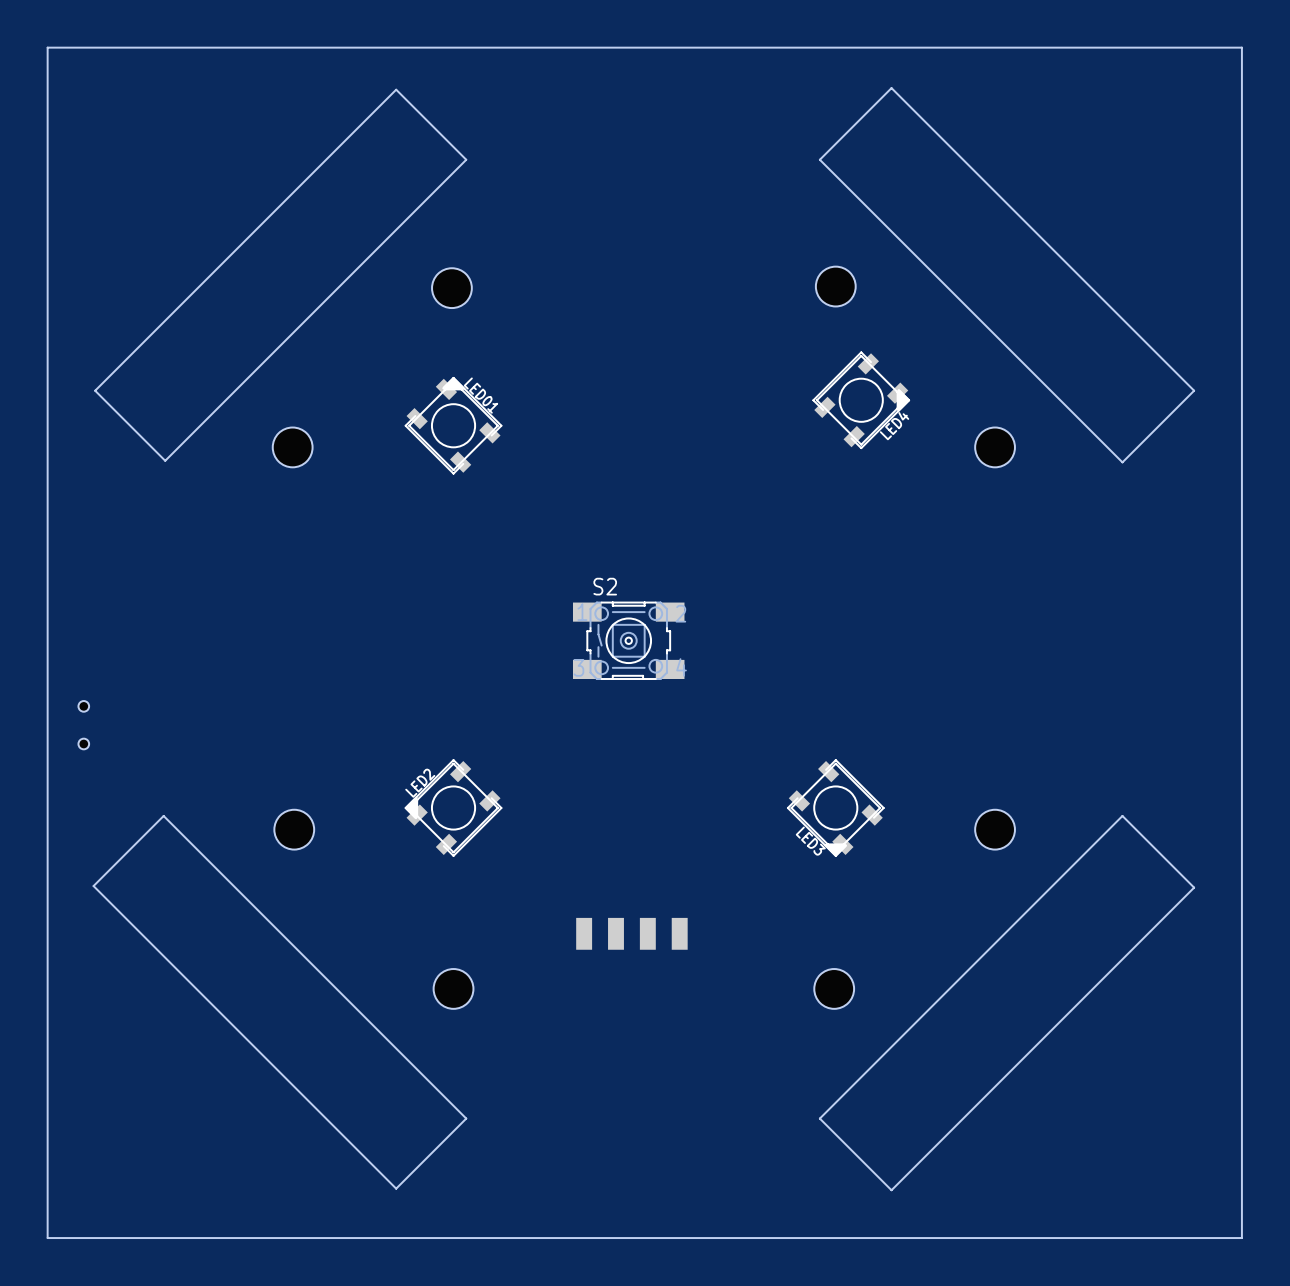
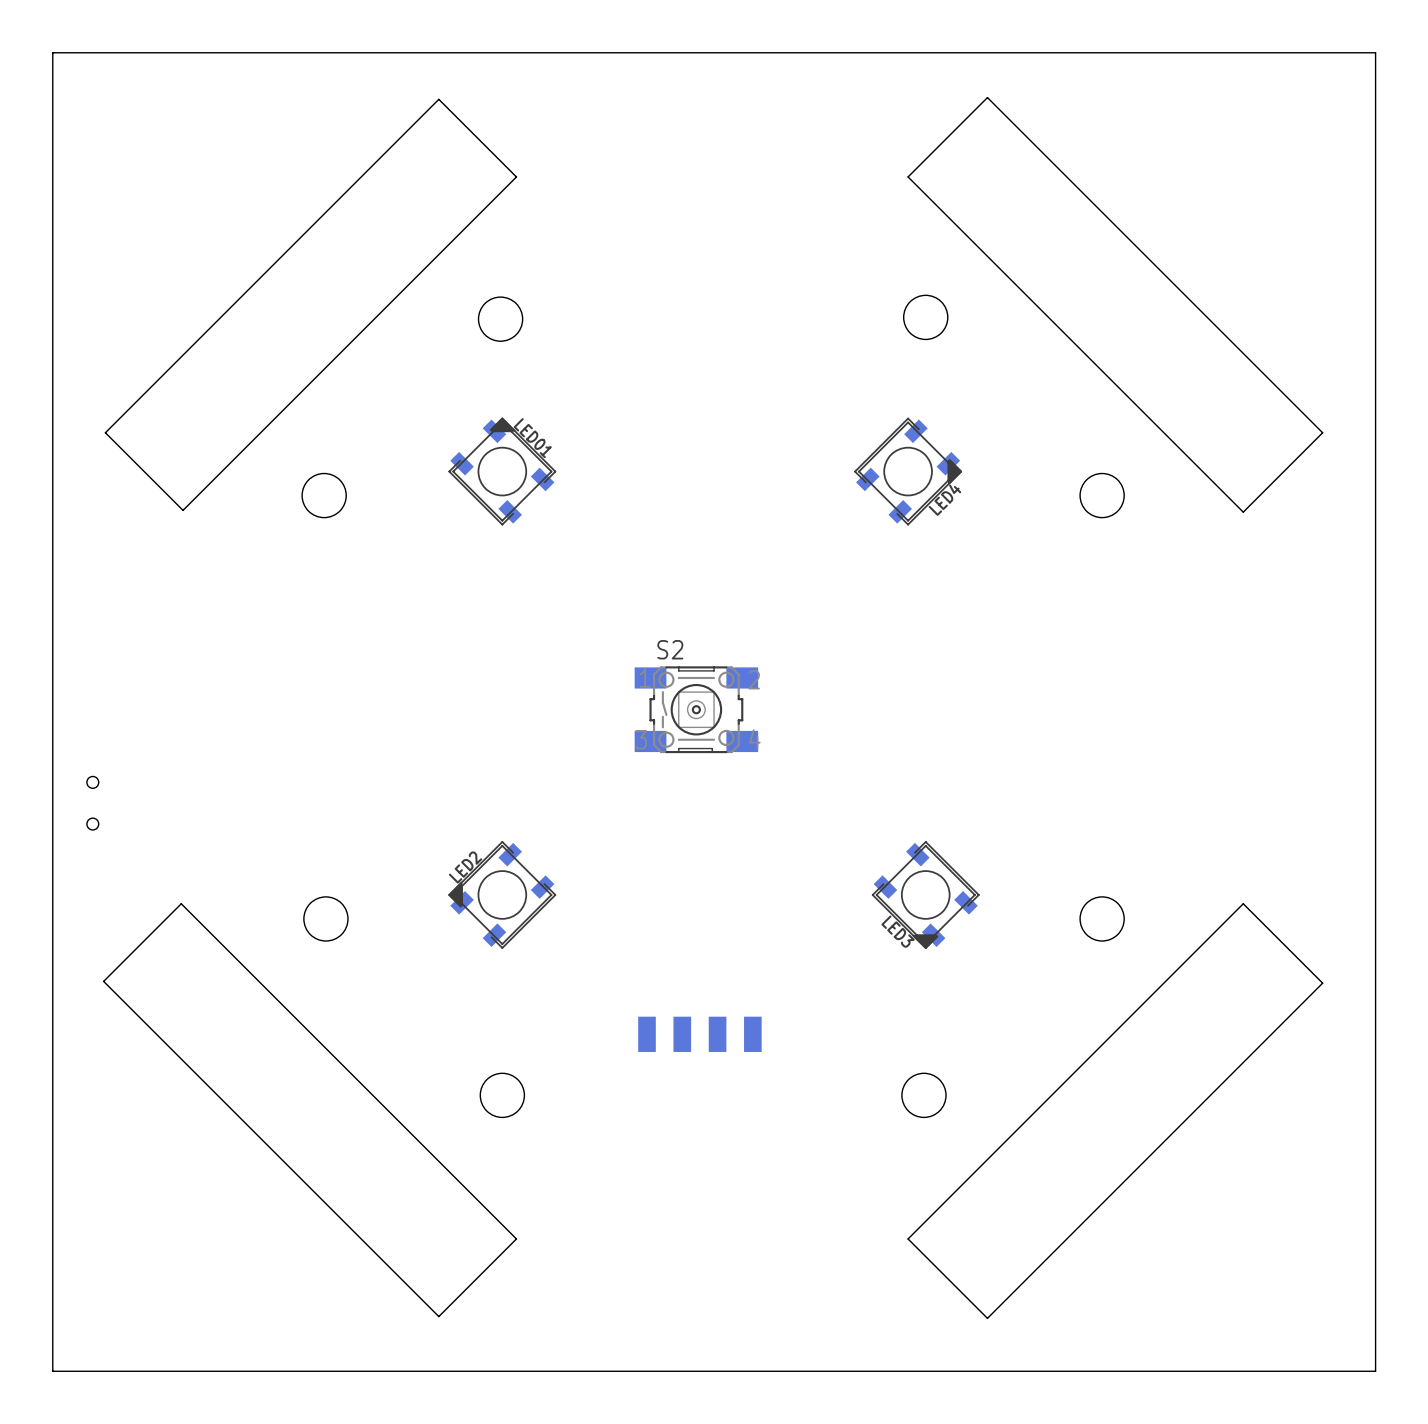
LED4 position: (861, 400) -> (908, 471)

